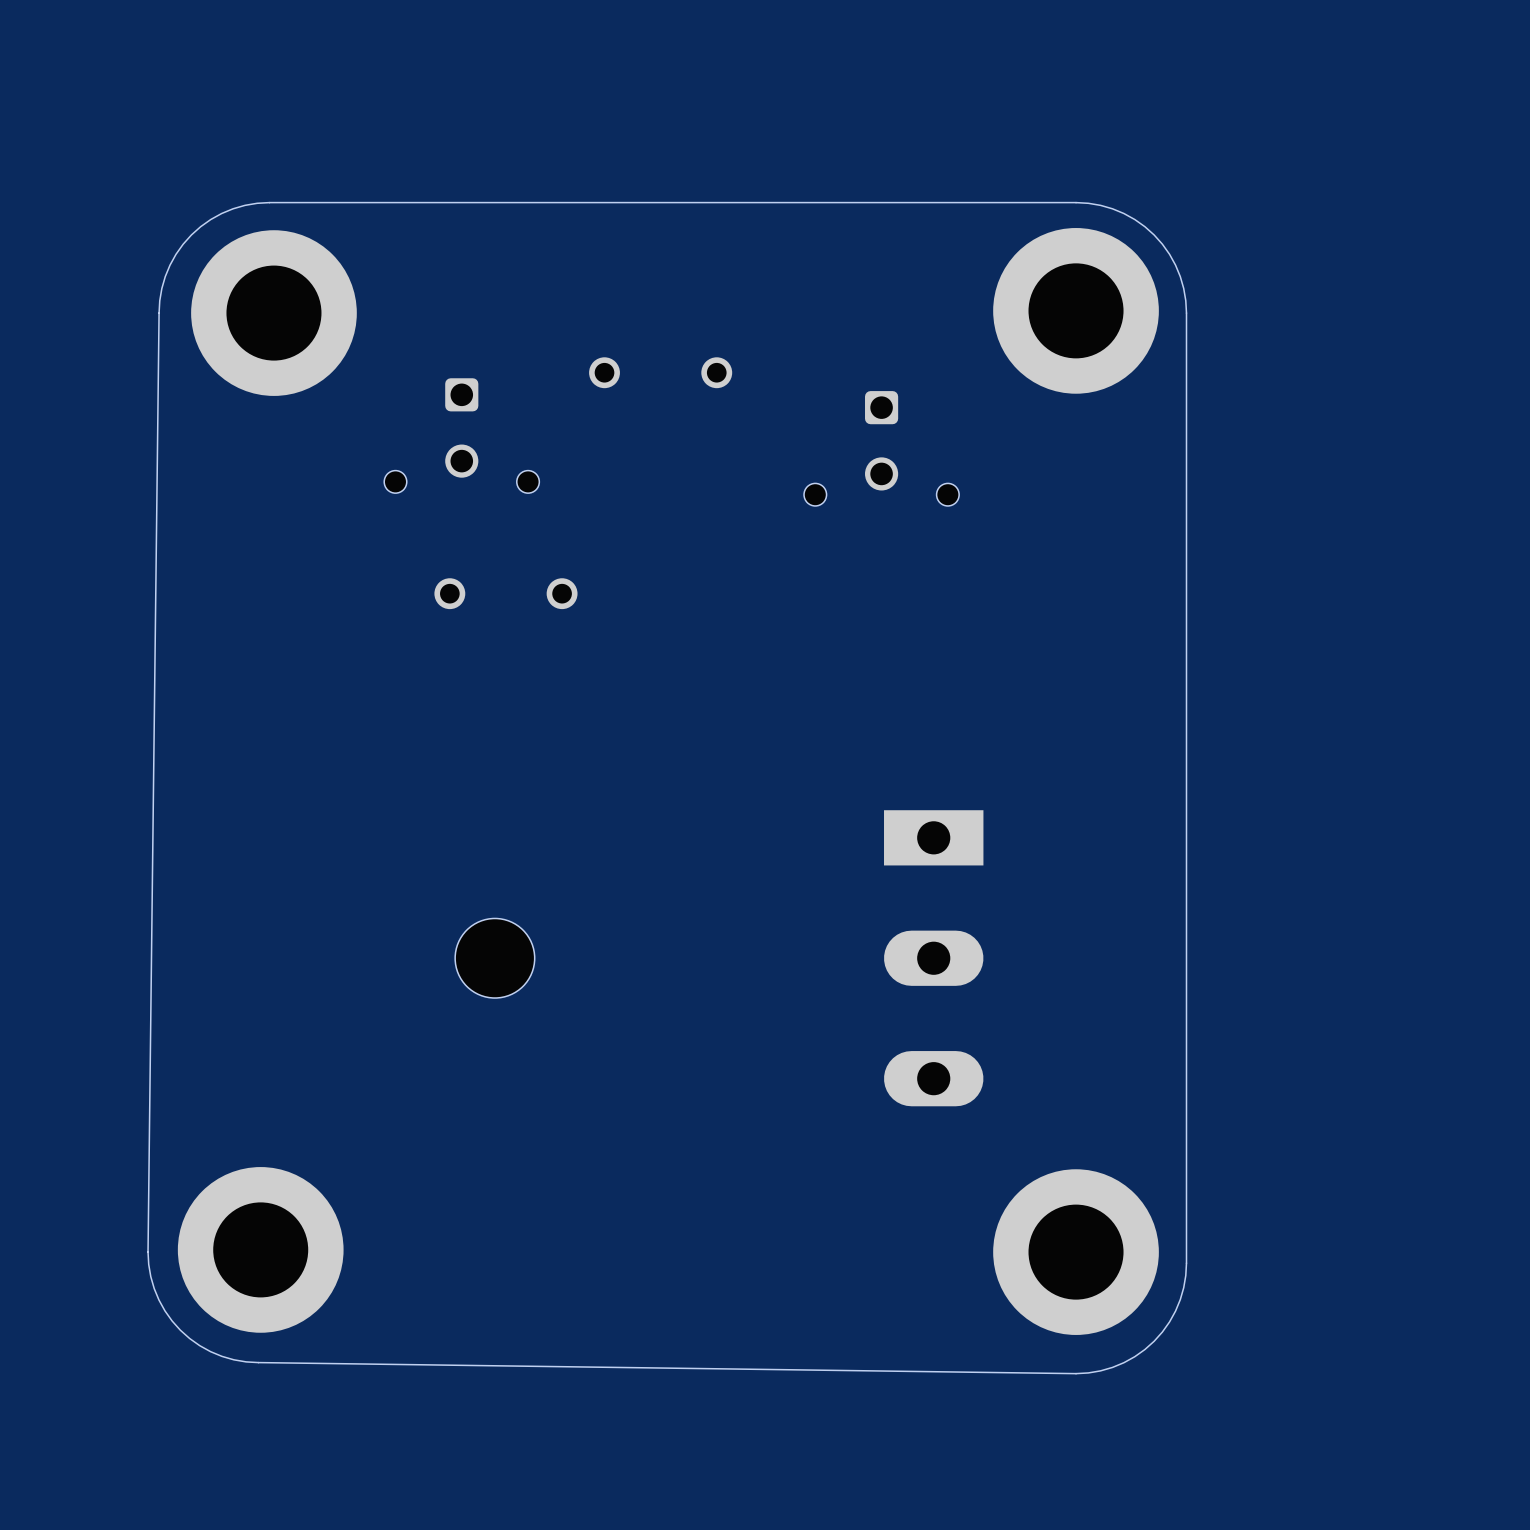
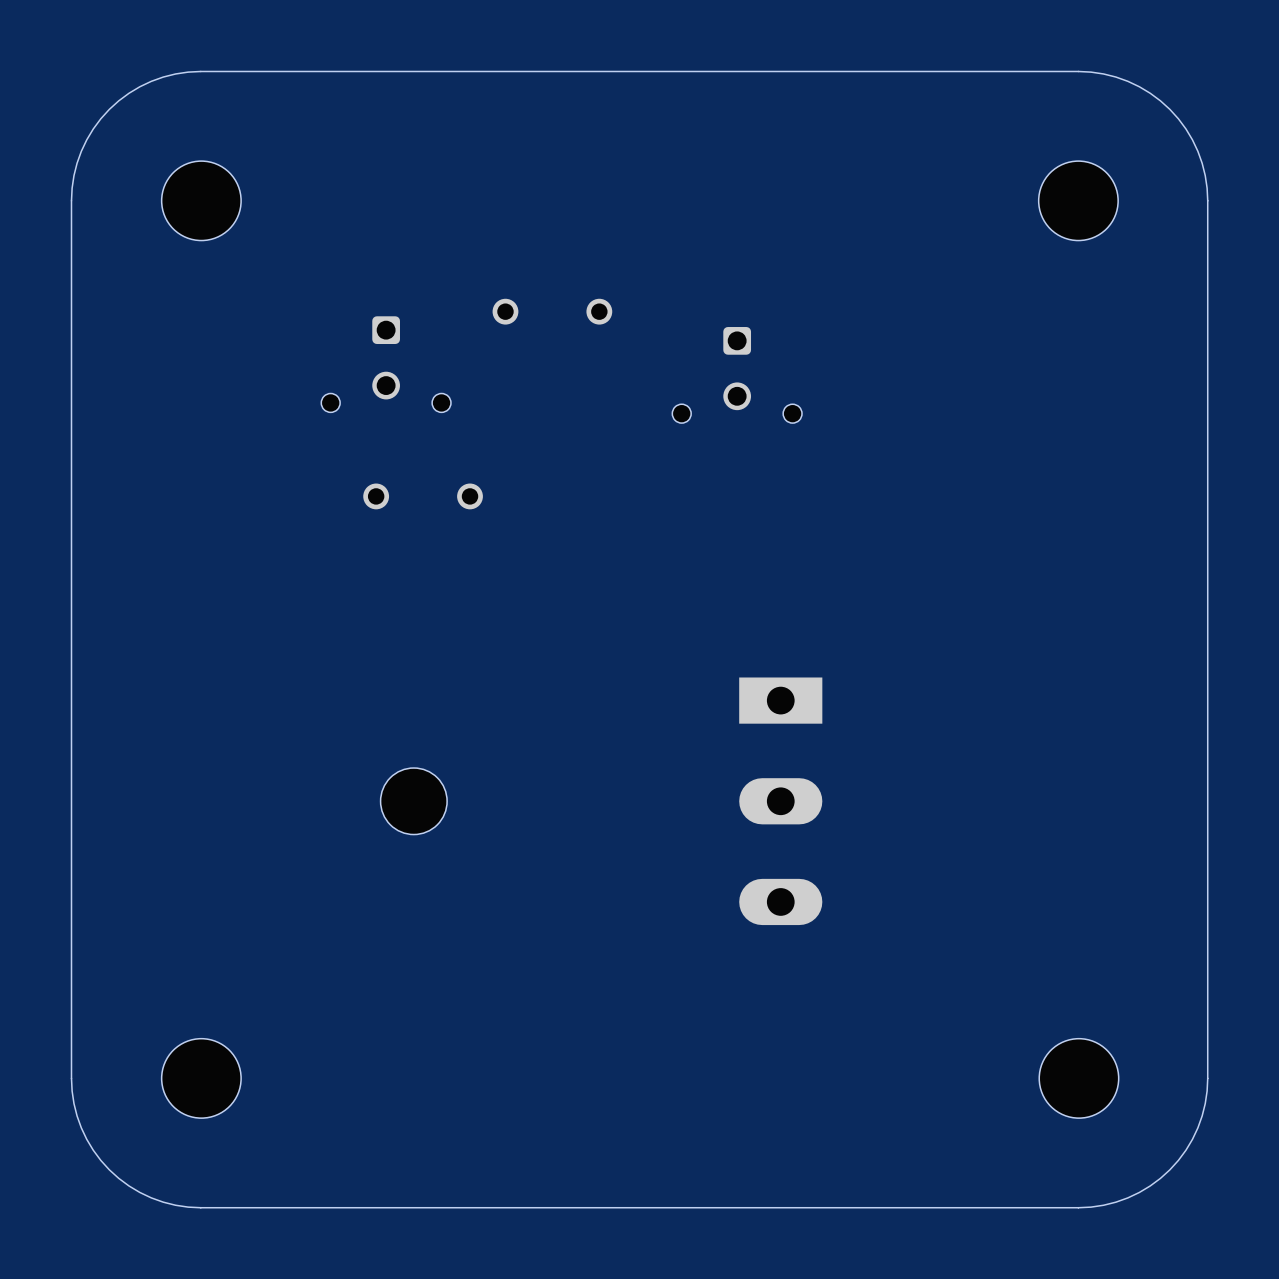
board edge: (1076, 202) (269, 202) (244, 205) (221, 213) (200, 226) (183, 244) (165, 276) (159, 313) (148, 1252) (150, 1276) (158, 1300) (172, 1320) (189, 1338) (222, 1356) (258, 1362) (1076, 1373) (1100, 1370) (1123, 1362) (1144, 1349) (1162, 1332) (1180, 1299) (1186, 1263) (1185, 300) (1180, 276) (1169, 254) (1144, 226) (1112, 208) (1076, 202) -> (1078, 71) (1115, 77) (1139, 86) (1160, 100) (1178, 118) (1192, 139) (1202, 163) (1207, 188) (1207, 1078) (1205, 1103) (1197, 1127) (1178, 1160) (1160, 1178) (1139, 1192) (1103, 1205) (1078, 1207) (200, 1207) (175, 1205) (151, 1197) (118, 1178) (93, 1150) (81, 1127) (73, 1103) (71, 1078) (71, 200) (77, 163) (86, 139) (100, 118) (118, 100) (151, 81) (175, 73) (200, 71) (1078, 71)
part: none -> (201, 200)
part: none -> (1078, 200)
part: (1076, 310) -> none
part: (273, 313) -> none
part: (260, 1249) -> none
part: (1076, 1252) -> none
part: none -> (201, 1078)
part: none -> (1078, 1078)

